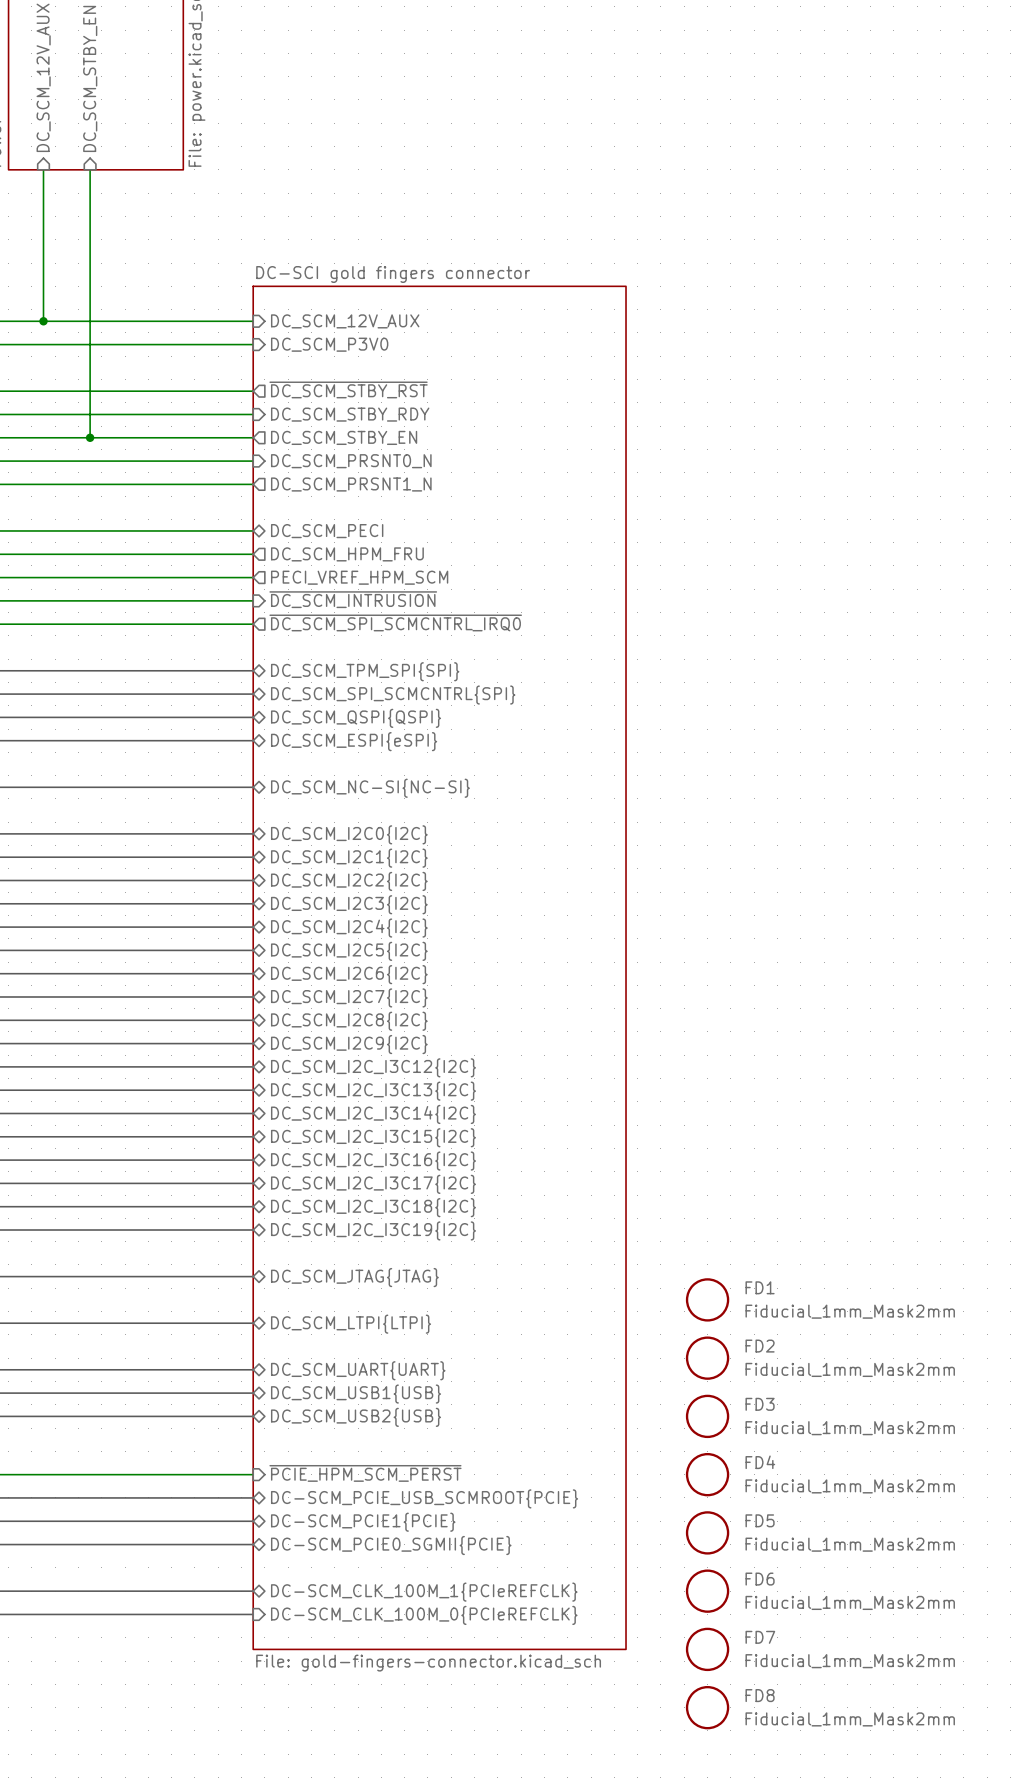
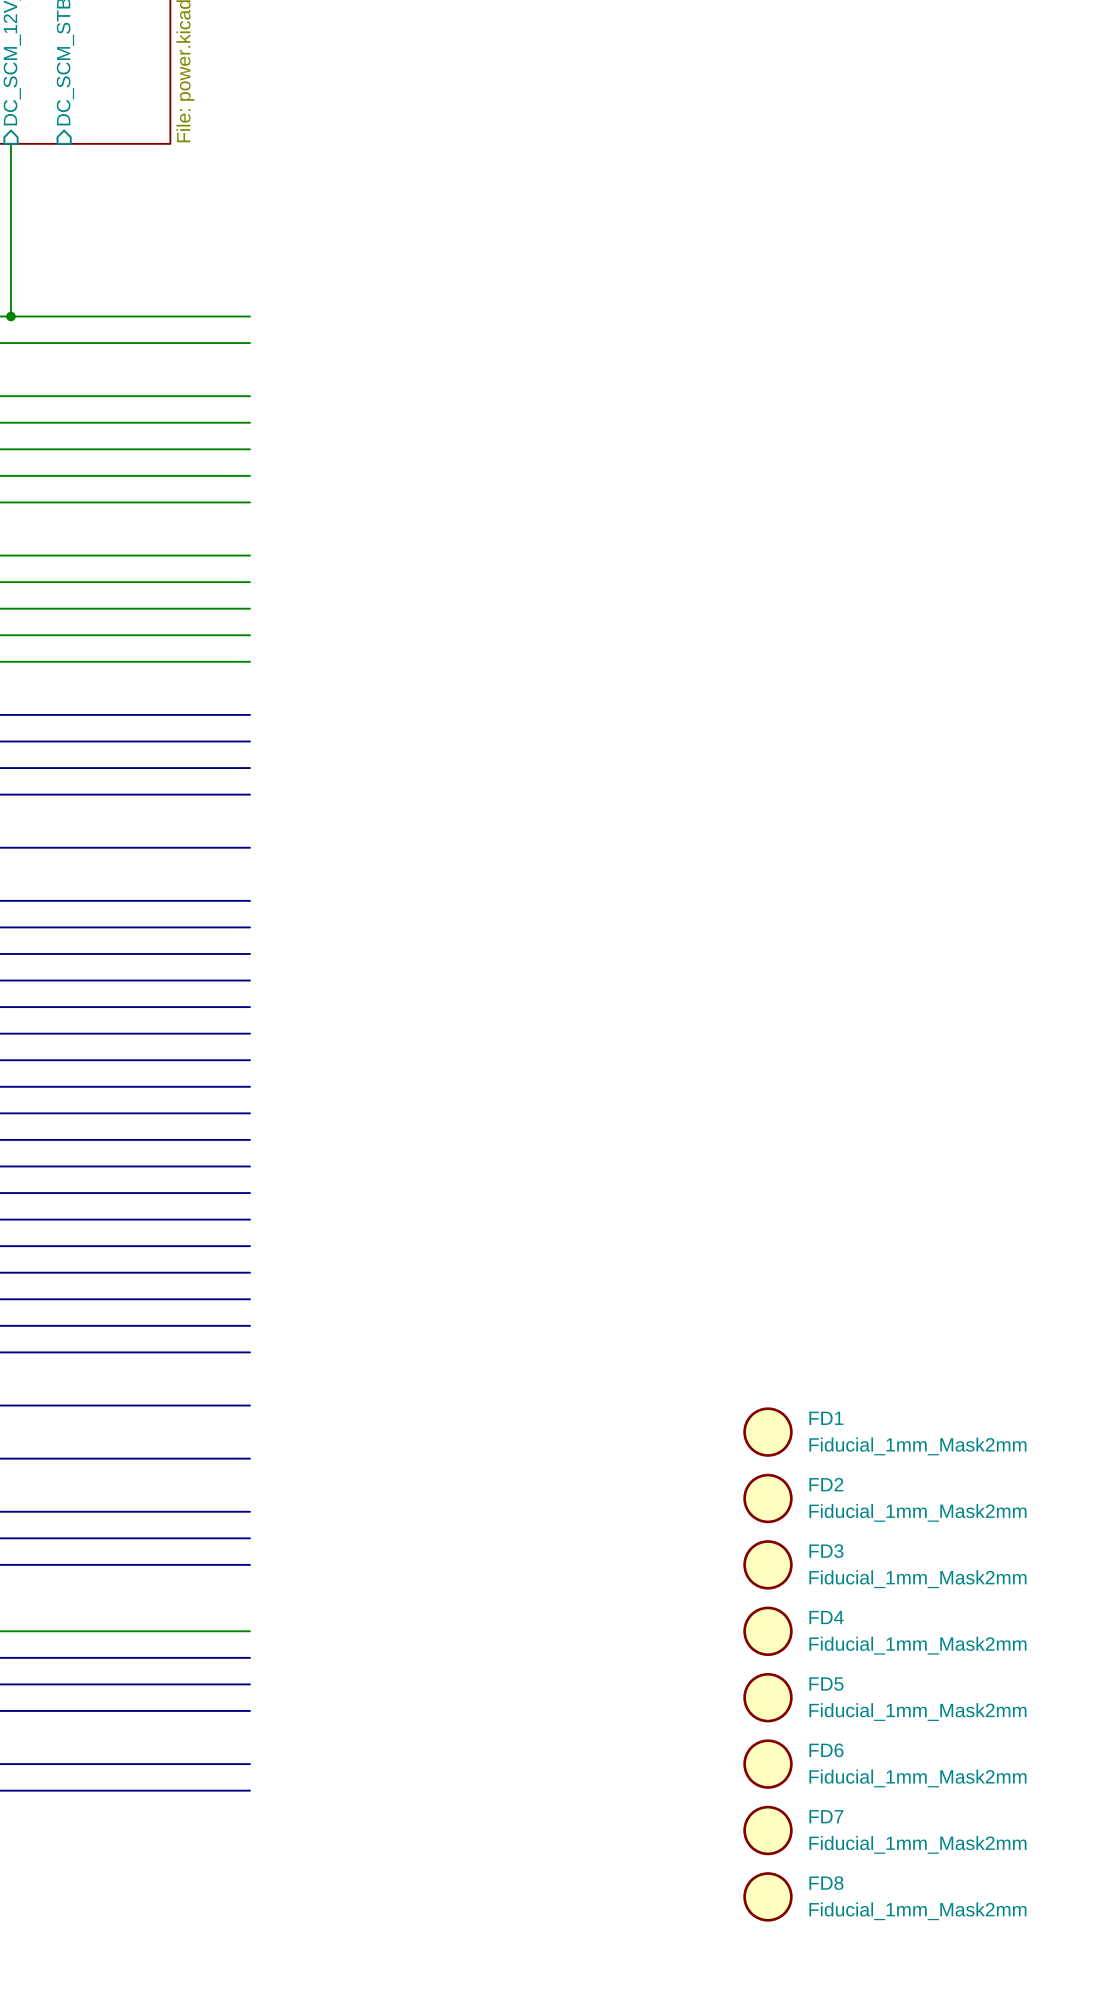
wire: (90, 169) (90, 437) -> none
sheet pin: DC_SCM_12V_AUX (345, 321) -> none
sheet pin: DC_SCM_P3V0 (329, 344) -> none
sheet pin: ~{DC_SCM_STBY_RST} (348, 389) -> none
sheet pin: DC_SCM_STBY_RDY (350, 414) -> none
junction: (90, 437) -> none
sheet pin: DC_SCM_STBY_EN (344, 437) -> none
sheet pin: DC_SCM_PRSNT0_N (351, 461) -> none
sheet pin: DC_SCM_PRSNT1_N (351, 484) -> none
sheet pin: DC_SCM_PECI (327, 531) -> none
sheet pin: DC_SCM_HPM_FRU (347, 554) -> none
sheet pin: PECI_VREF_HPM_SCM (359, 577) -> none
sheet pin: ~{DC_SCM_INTRUSION} (353, 599) -> none
sheet pin: ~{DC_SCM_SPI_SCMCNTRL_IRQ0} (395, 622) -> none
sheet pin: DC_SCM_TPM_SPI{SPI} (365, 671) -> none
sheet pin: DC_SCM_SPI_SCMCNTRL{SPI} (393, 695) -> none
sheet pin: DC_SCM_QSPI{QSPI} (356, 718) -> none
sheet pin: DC_SCM_ESPI{eSPI} (354, 741) -> none
sheet pin: DC_SCM_NC-SI{NC-SI} (370, 788) -> none
sheet pin: DC_SCM_I2C0{I2C} (349, 834) -> none
sheet pin: DC_SCM_I2C1{I2C} (349, 858) -> none
sheet pin: DC_SCM_I2C2{I2C} (349, 881) -> none
sheet pin: DC_SCM_I2C3{I2C} (349, 904) -> none
sheet pin: DC_SCM_I2C4{I2C} (349, 928) -> none
sheet pin: DC_SCM_I2C5{I2C} (349, 951) -> none
sheet DC-SCI gold fingers connector: File: gold-fingers-connector.kicad_sch (439, 967) -> none
sheet pin: DC_SCM_I2C6{I2C} (349, 974) -> none
sheet pin: DC_SCM_I2C7{I2C} (349, 997) -> none
sheet pin: DC_SCM_I2C8{I2C} (349, 1021) -> none
sheet pin: DC_SCM_I2C9{I2C} (349, 1044) -> none
sheet pin: DC_SCM_I2C_I3C12{I2C} (373, 1067) -> none
sheet pin: DC_SCM_I2C_I3C13{I2C} (373, 1091) -> none
sheet pin: DC_SCM_I2C_I3C14{I2C} (373, 1114) -> none
sheet pin: DC_SCM_I2C_I3C15{I2C} (373, 1137) -> none
sheet pin: DC_SCM_I2C_I3C16{I2C} (373, 1161) -> none
sheet pin: DC_SCM_I2C_I3C17{I2C} (373, 1184) -> none
sheet pin: DC_SCM_I2C_I3C18{I2C} (373, 1207) -> none
sheet pin: DC_SCM_I2C_I3C19{I2C} (373, 1230) -> none
sheet pin: DC_SCM_JTAG{JTAG} (354, 1277) -> none
sheet pin: DC_SCM_LTPI{LTPI} (351, 1324) -> none
sheet pin: DC_SCM_UART{UART} (358, 1370) -> none
sheet pin: DC_SCM_USB1{USB} (356, 1394) -> none
sheet pin: DC_SCM_USB2{USB} (356, 1417) -> none
sheet pin: ~{PCIE_HPM_SCM_PERST} (365, 1473) -> none
sheet pin: DC-SCM_PCIE_USB_SCMROOT{PCIE} (424, 1498) -> none
sheet pin: DC-SCM_PCIE1{PCIE} (363, 1522) -> none
sheet pin: DC-SCM_PCIE0_SGMII{PCIE} (391, 1545) -> none
sheet pin: DC-SCM_CLK_100M_1{PCIeREFCLK} (424, 1592) -> none
sheet pin: DC-SCM_CLK_100M_0{PCIeREFCLK} (424, 1615) -> none

